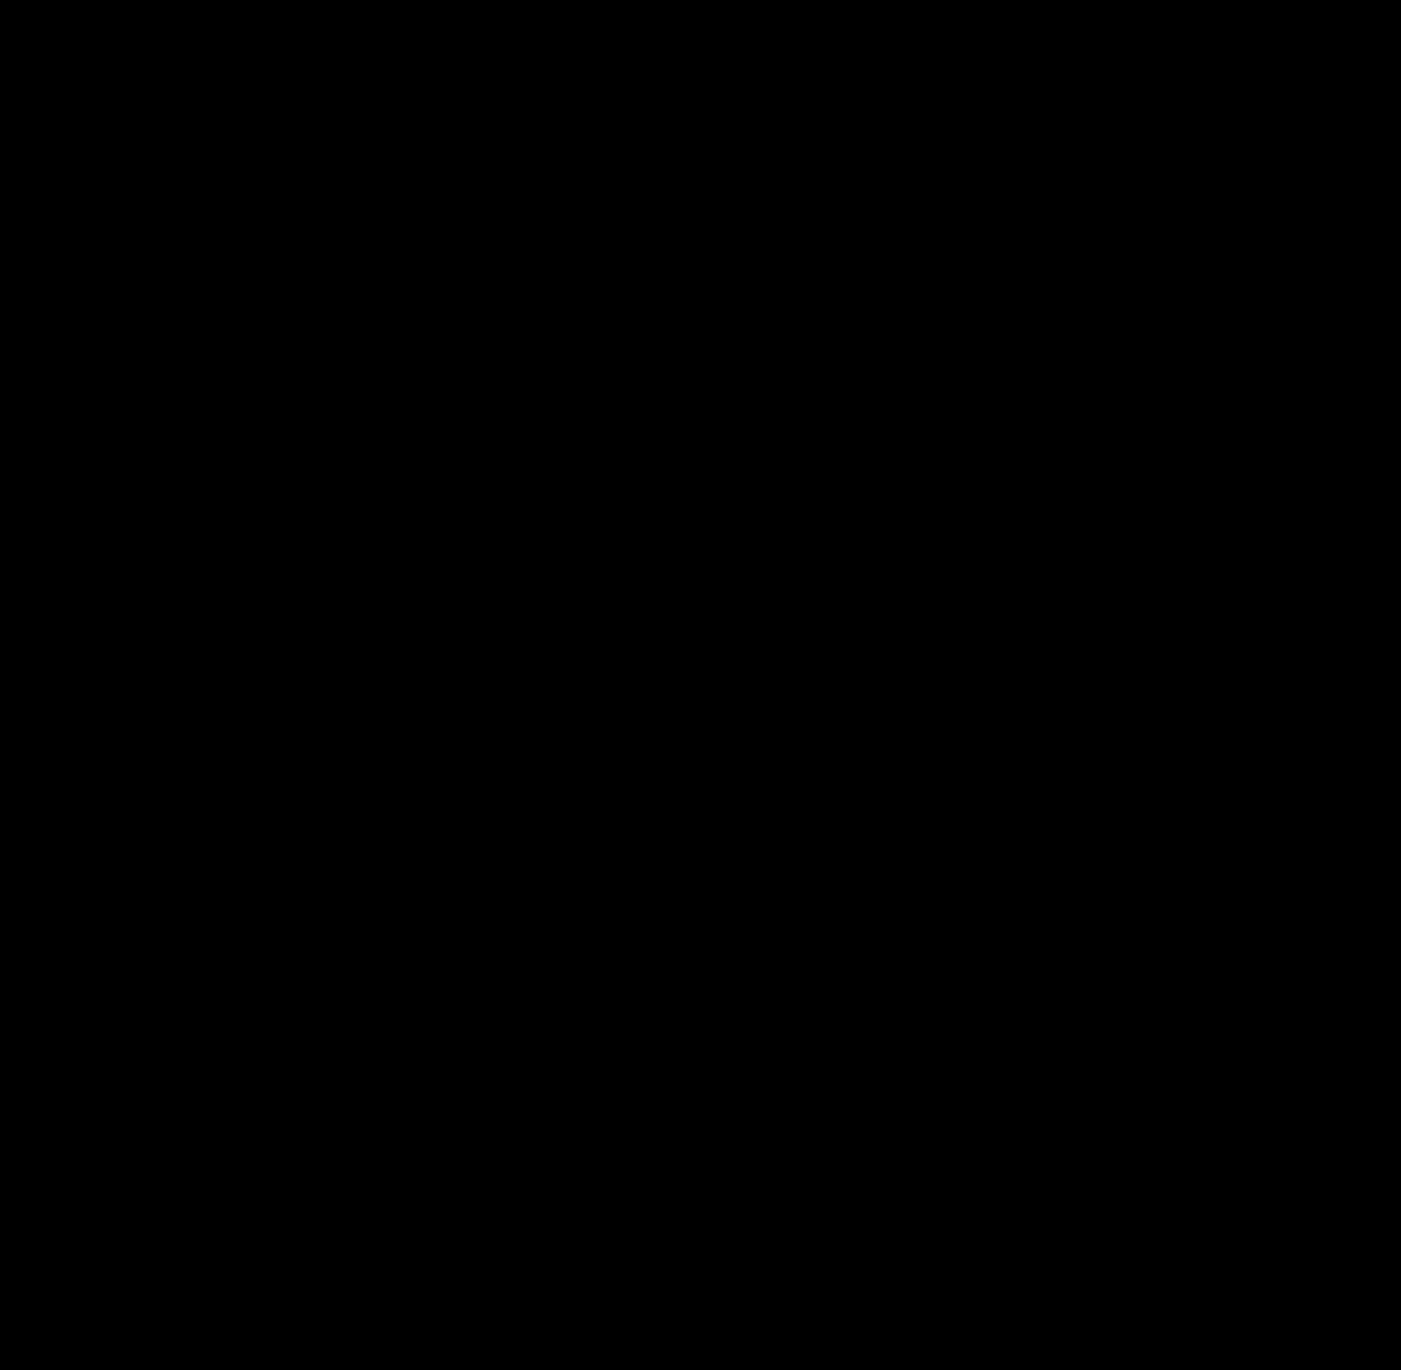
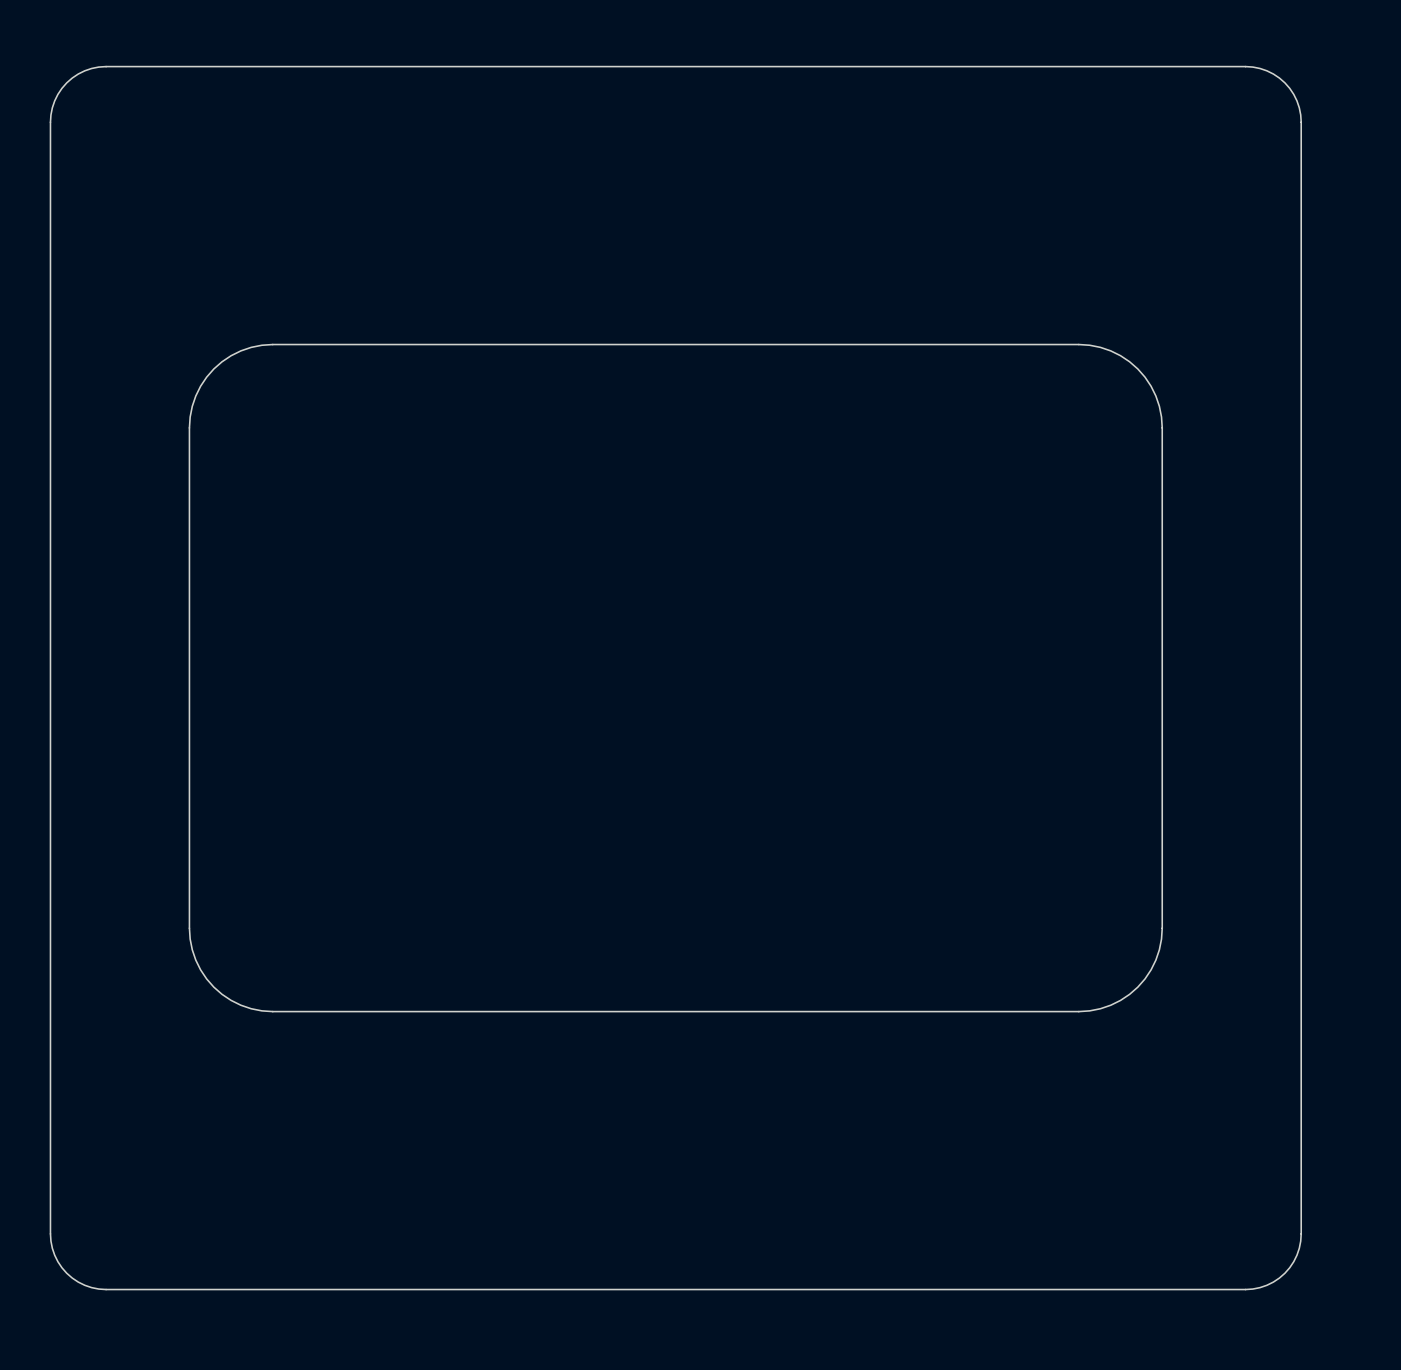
board edge: none -> (1245, 66) (106, 66) (84, 70) (66, 82) (54, 100) (50, 122) (50, 1233) (54, 1255) (66, 1273) (84, 1285) (106, 1289) (1245, 1289) (1266, 1285) (1284, 1273) (1296, 1255) (1301, 1233) (1301, 122) (1296, 100) (1284, 82) (1266, 70) (1245, 66)
board edge: none -> (1078, 344) (272, 344) (251, 347) (222, 361) (200, 386) (192, 406) (189, 427) (189, 928) (192, 949) (206, 978) (231, 1000) (251, 1008) (272, 1011) (1078, 1011) (1100, 1008) (1129, 994) (1151, 969) (1159, 949) (1162, 928) (1161, 417) (1151, 386) (1129, 361) (1100, 347) (1078, 344)

